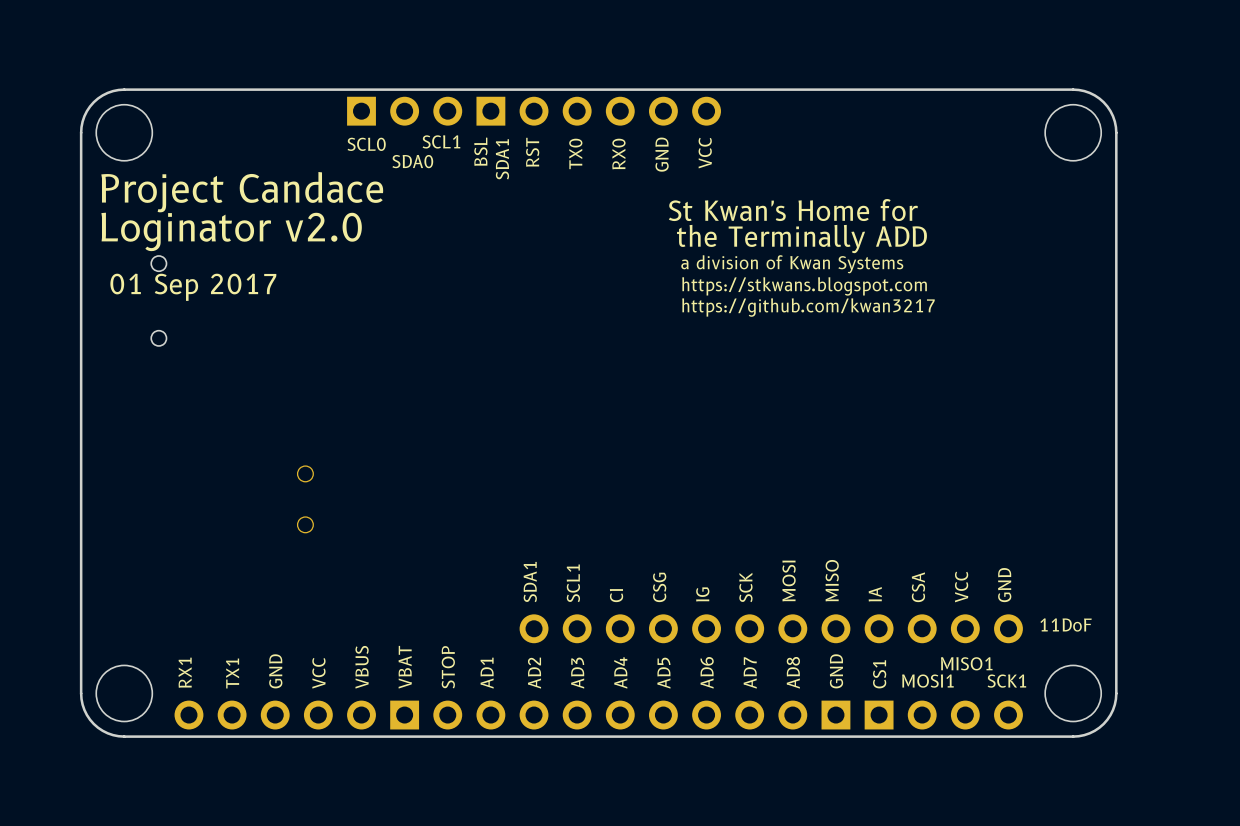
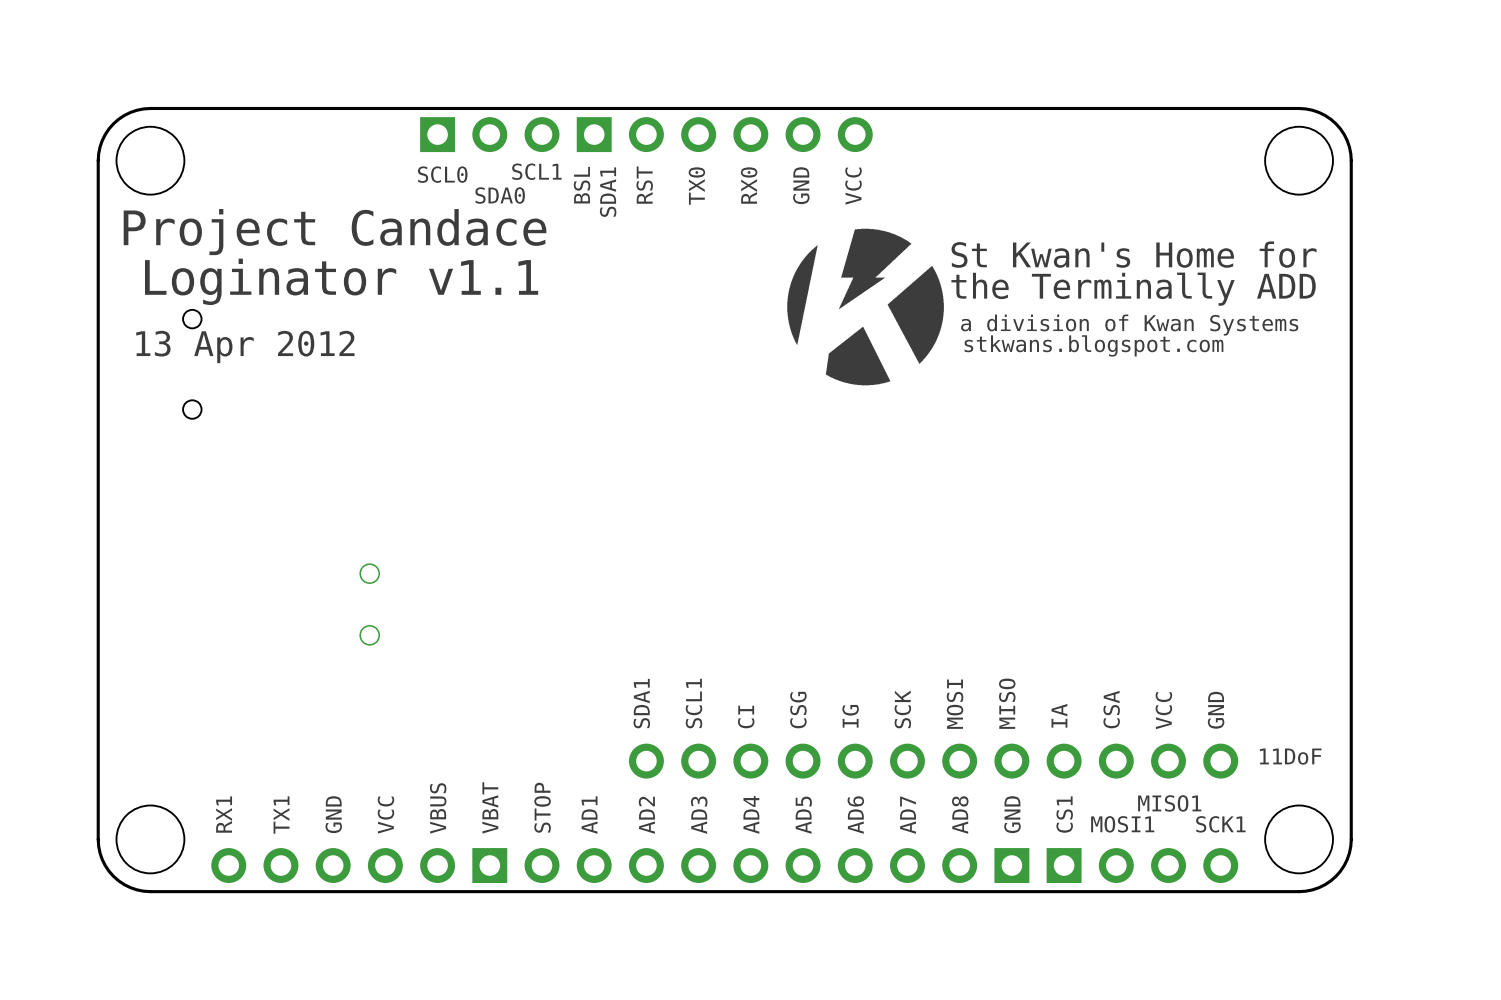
drawing: none -> [787, 228, 944, 386]
text position: St Kwan's Home for (793, 210) -> St Kwan's Home for (1134, 254)
text: Loginator v2.0 (231, 231) -> Loginator v1.1 (341, 281)
text position: the Terminally ADD (801, 239) -> the Terminally ADD (1133, 289)
text position: a division of Kwan Systems (792, 264) -> a division of Kwan Systems (1129, 325)
text: https://stkwans.blogspot.com (804, 286) -> stkwans.blogspot.com (1093, 345)
text: 01 Sep 2017 (193, 287) -> 13 Apr 2012 (245, 346)
text: https://github.com/kwan3217 (808, 307) -> none

